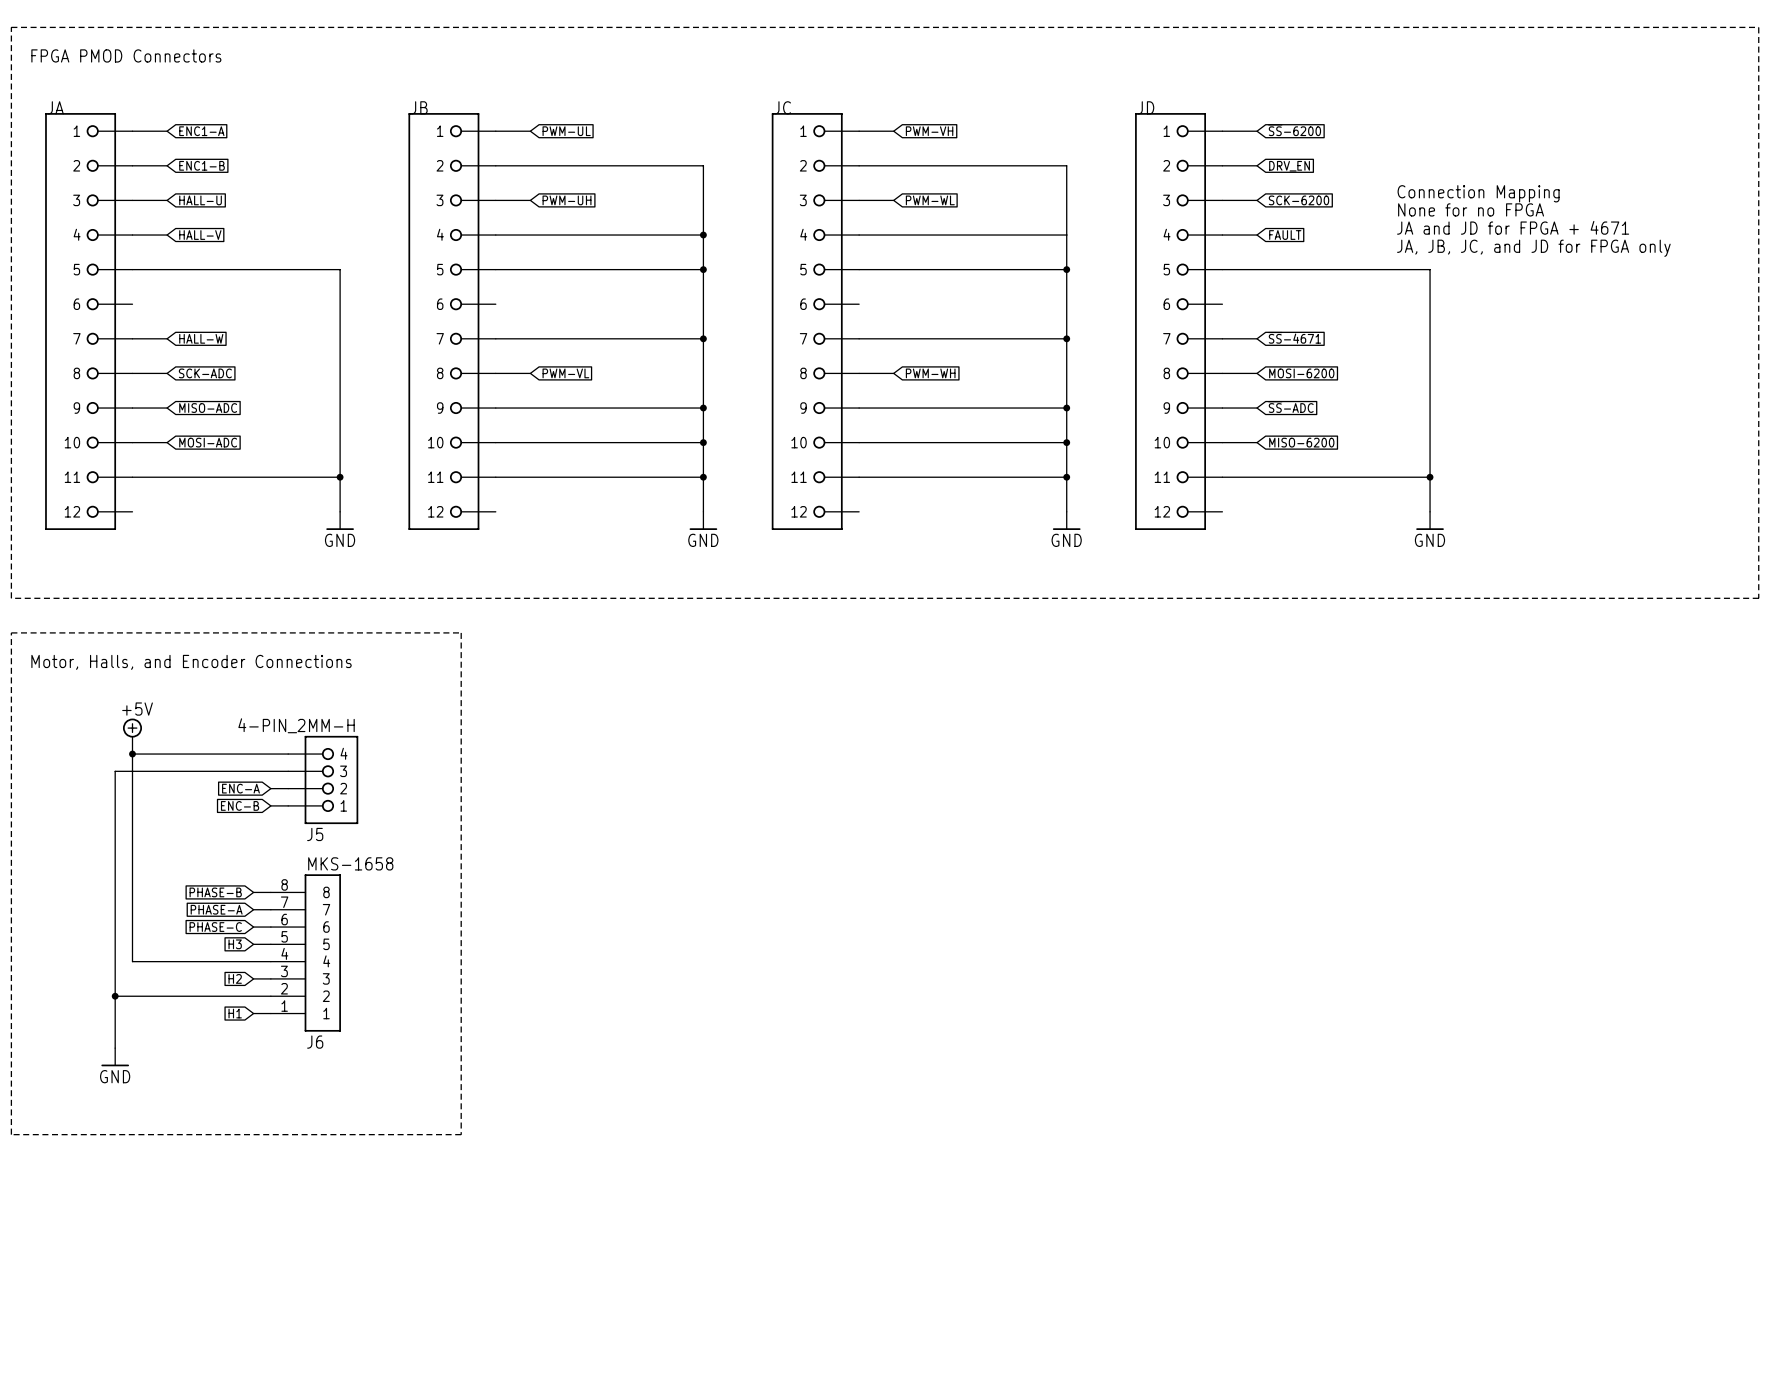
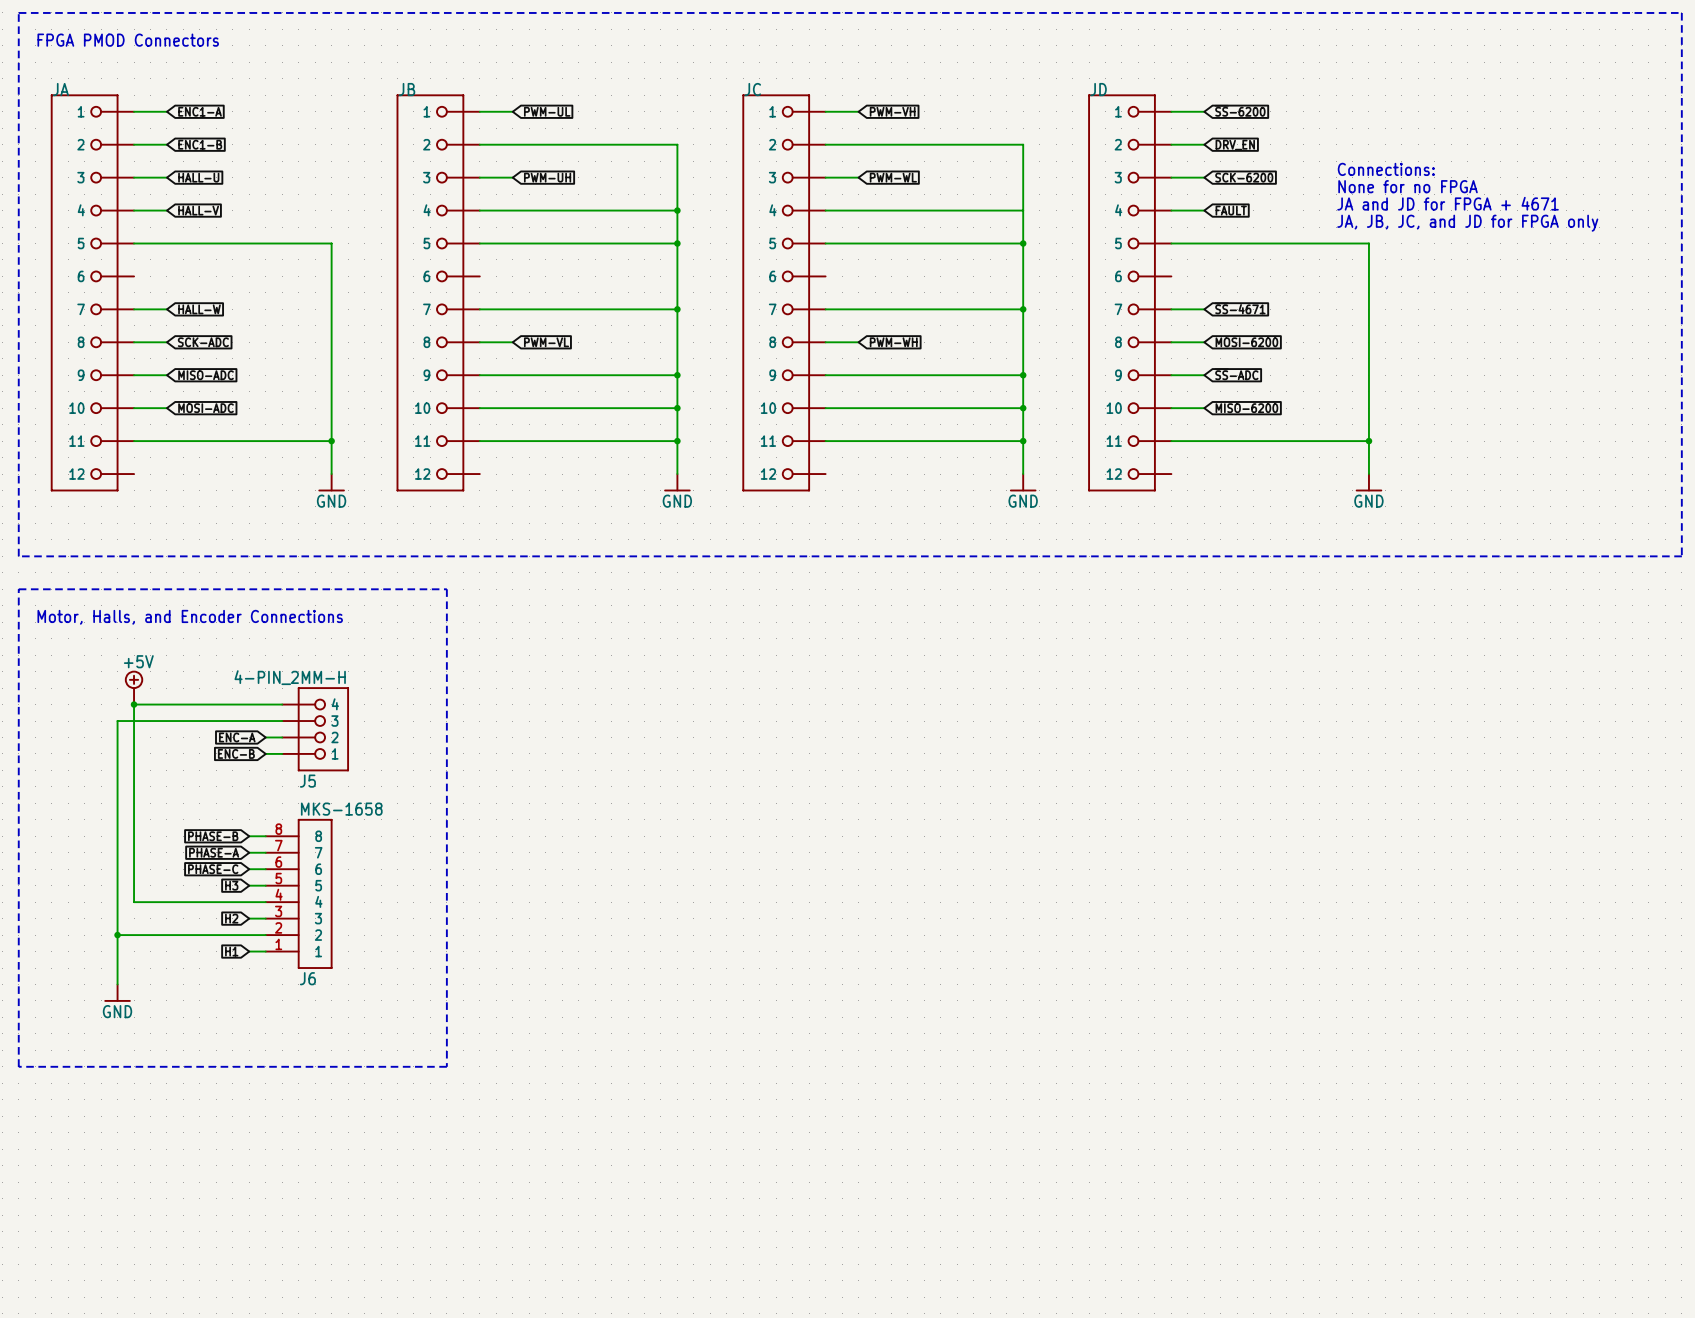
text: Connection Mapping (1478, 193) -> Connections: (1386, 169)

